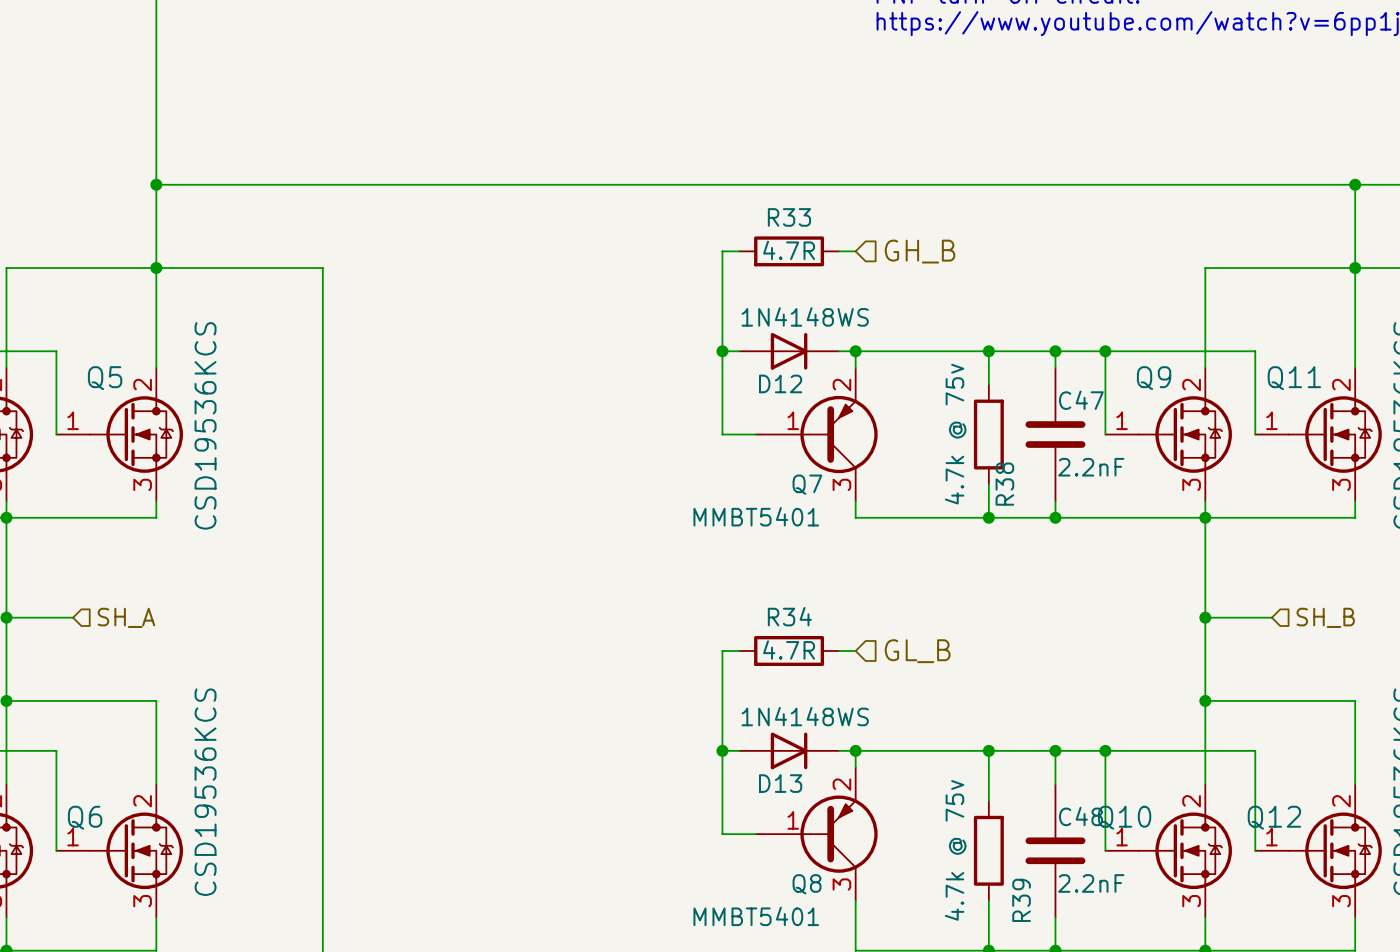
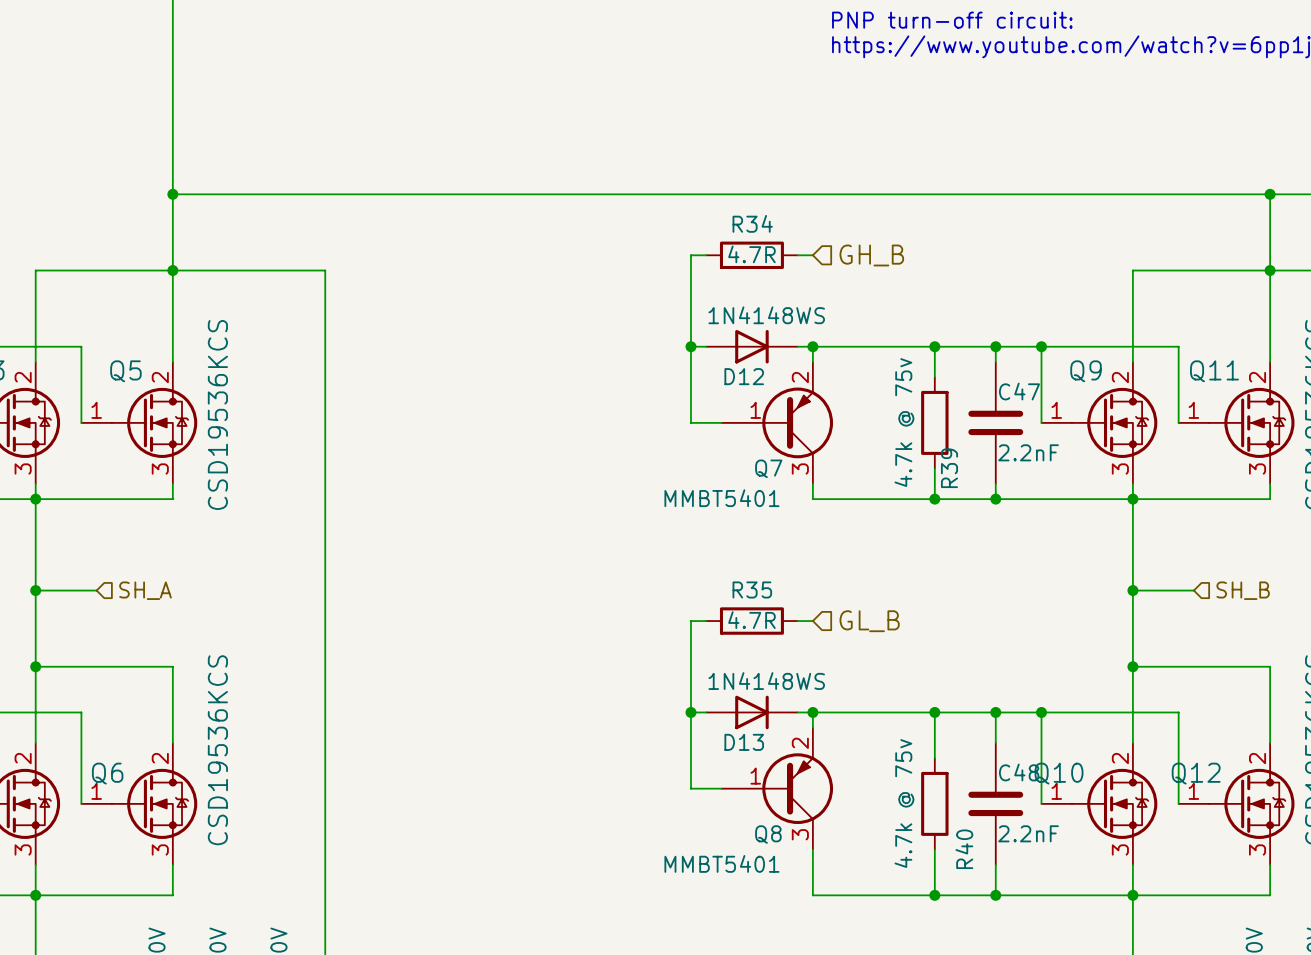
R33 name: R33 (789, 217) -> R34 (752, 223)
R38 name: R38 (1004, 484) -> R39 (949, 468)
R34 name: R34 (789, 616) -> R35 (752, 589)
R39 name: R39 (1021, 900) -> R40 (964, 849)

